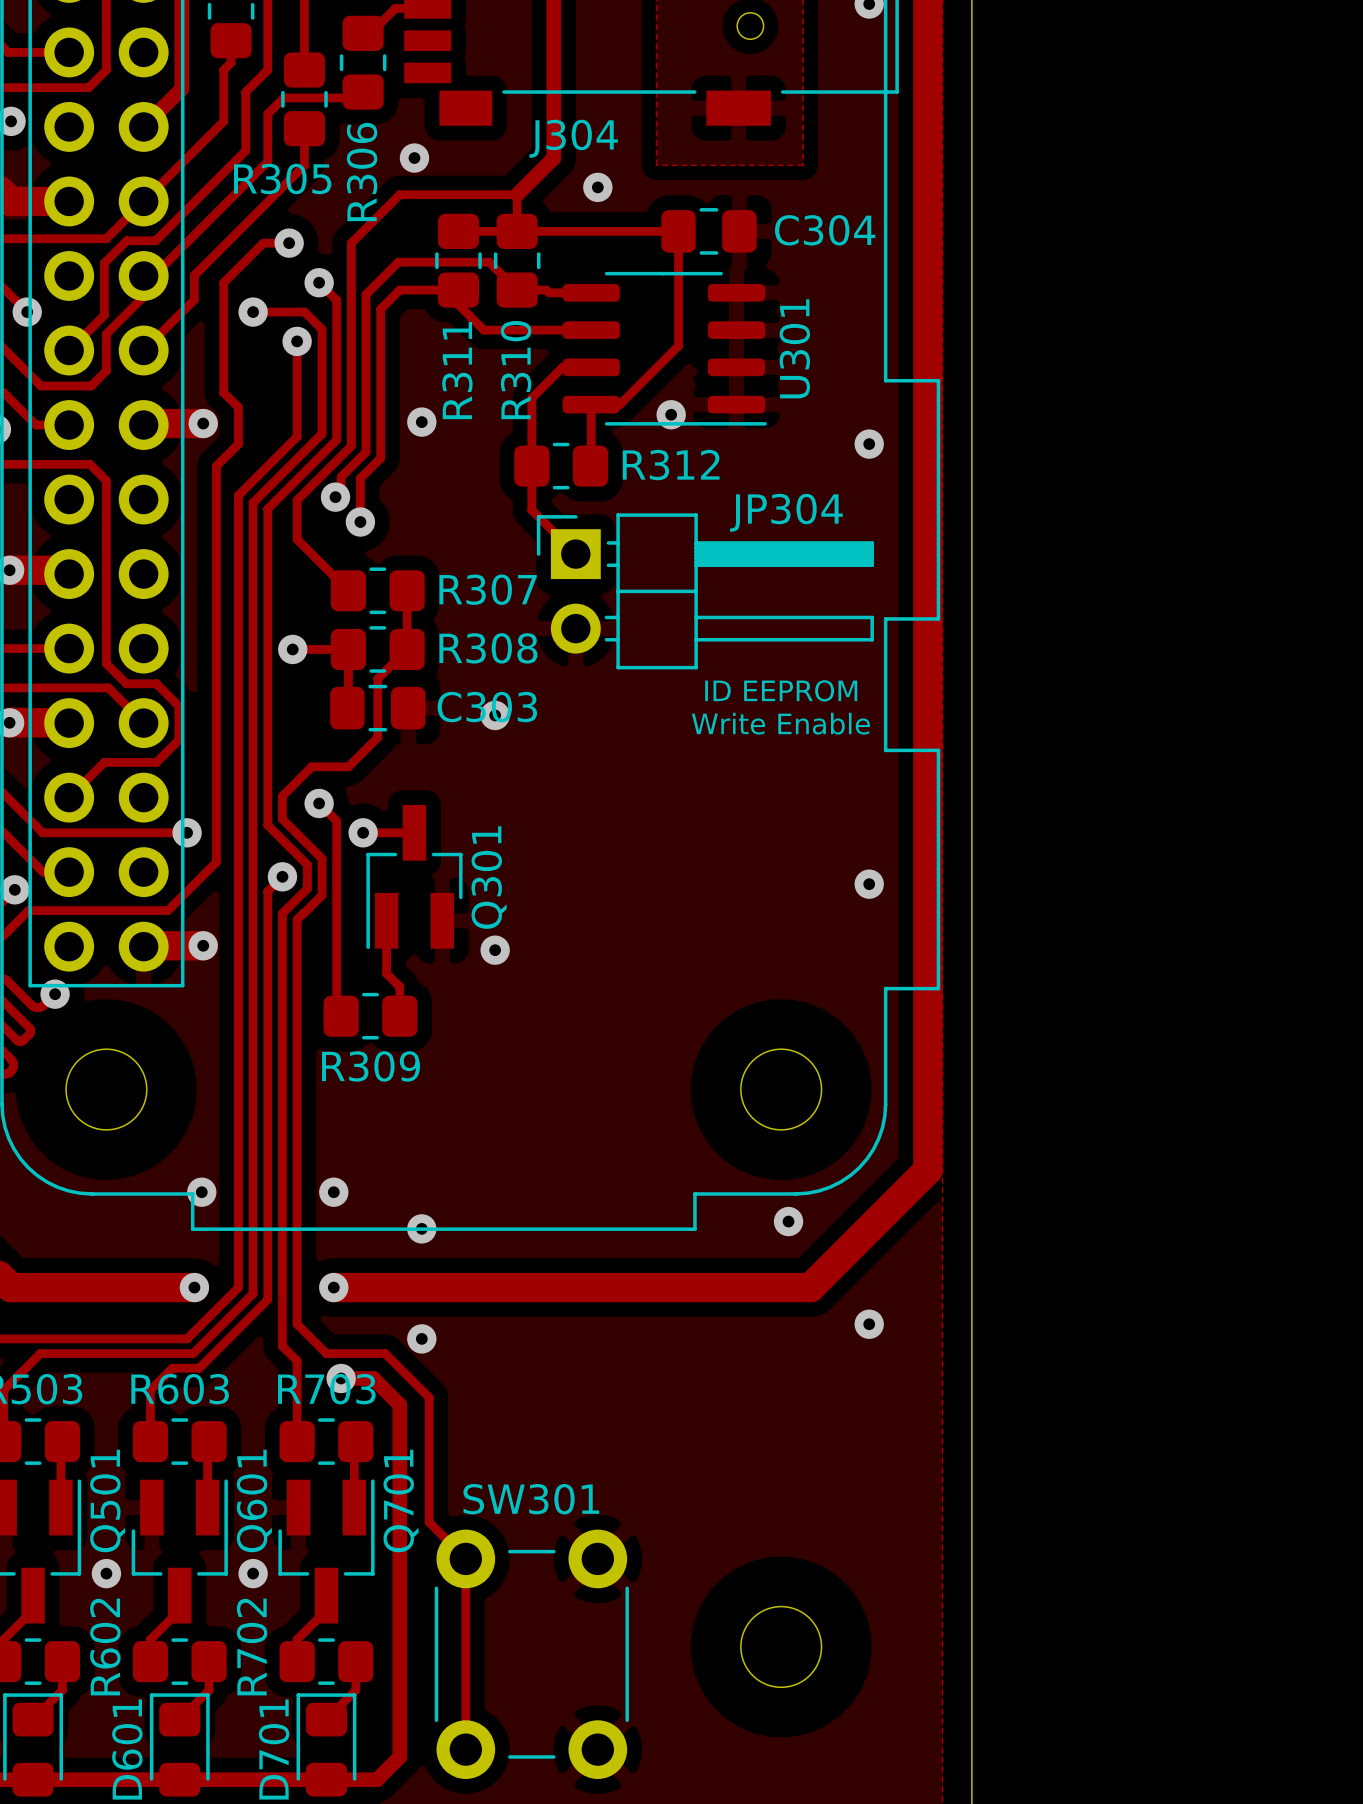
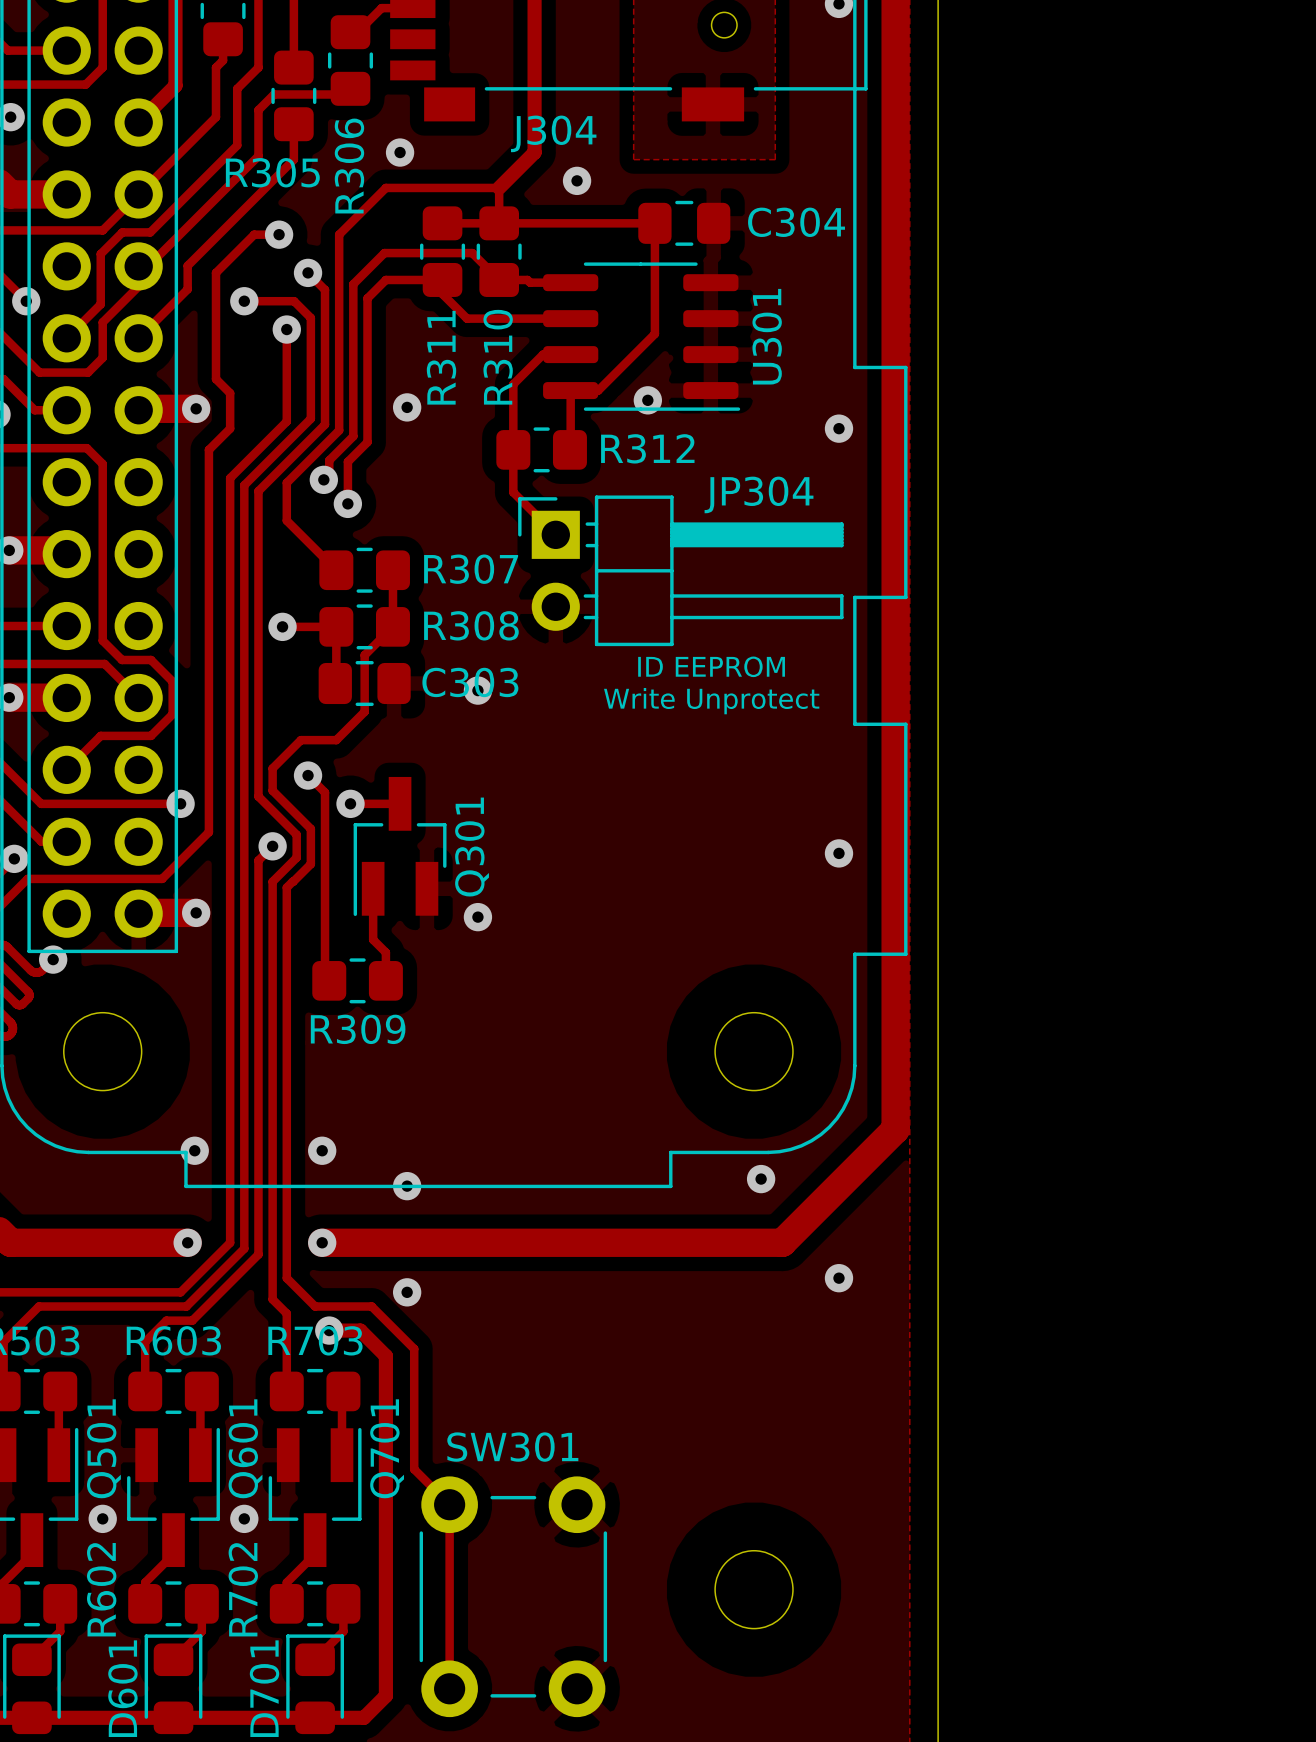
text position: ID EEPROM (781, 690) -> ID EEPROM (711, 666)
text: Write Enable (780, 723) -> none
text: none -> Write Unprotect (711, 701)

